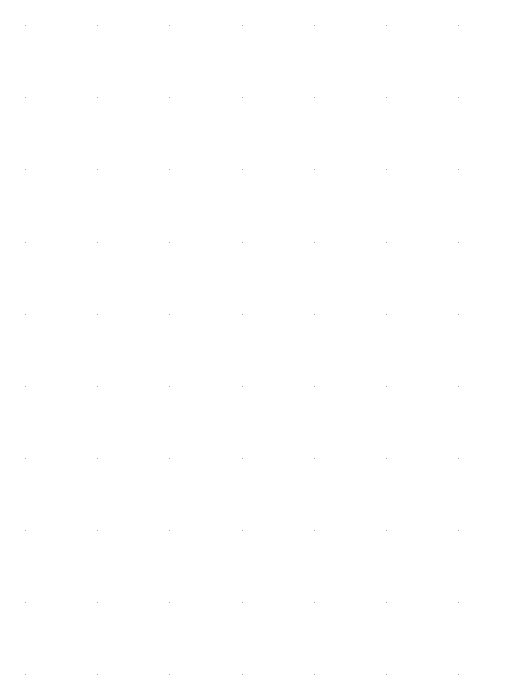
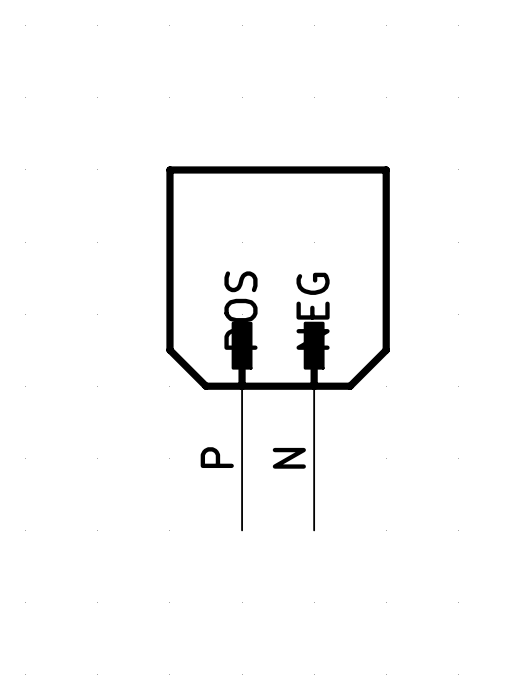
part: none -> (278, 348)

